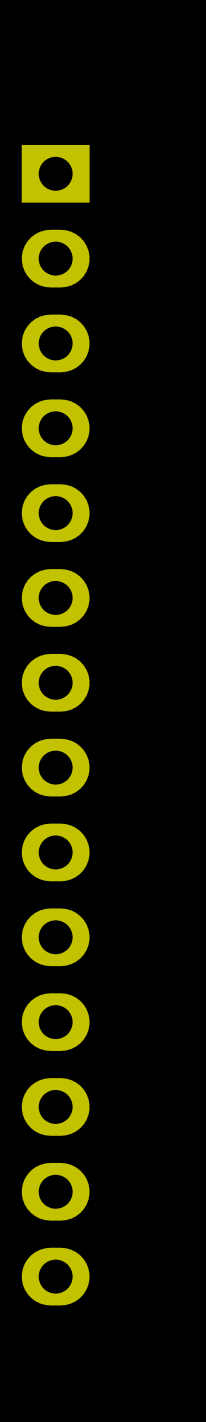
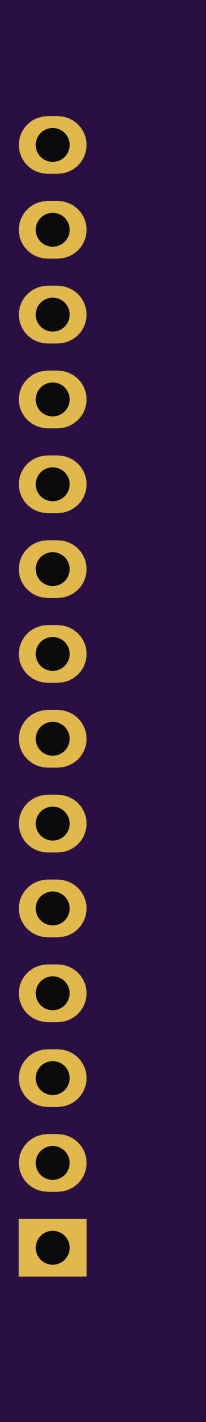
part rotation: 0° (55, 725) -> 180° (52, 696)

